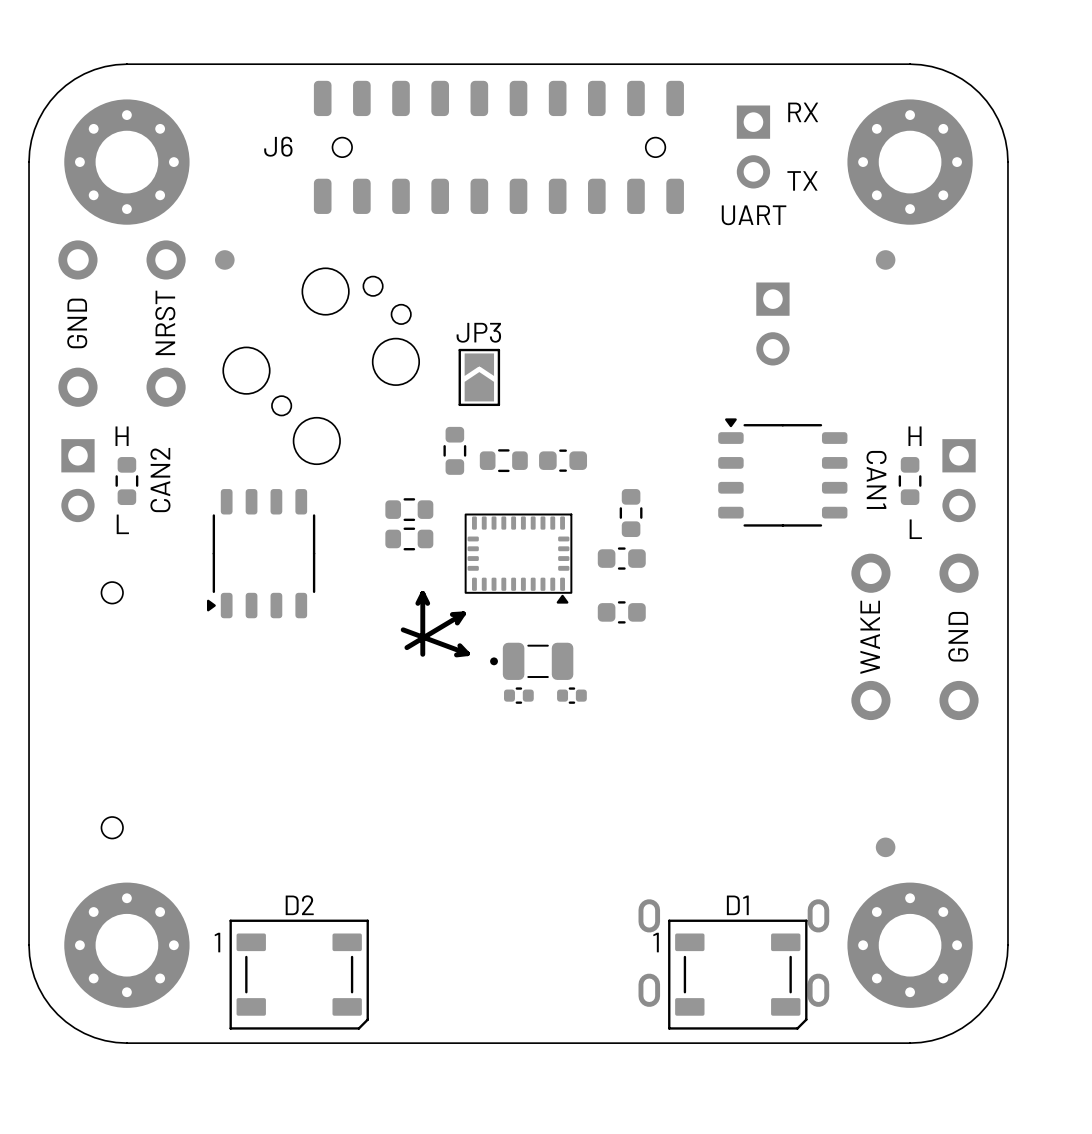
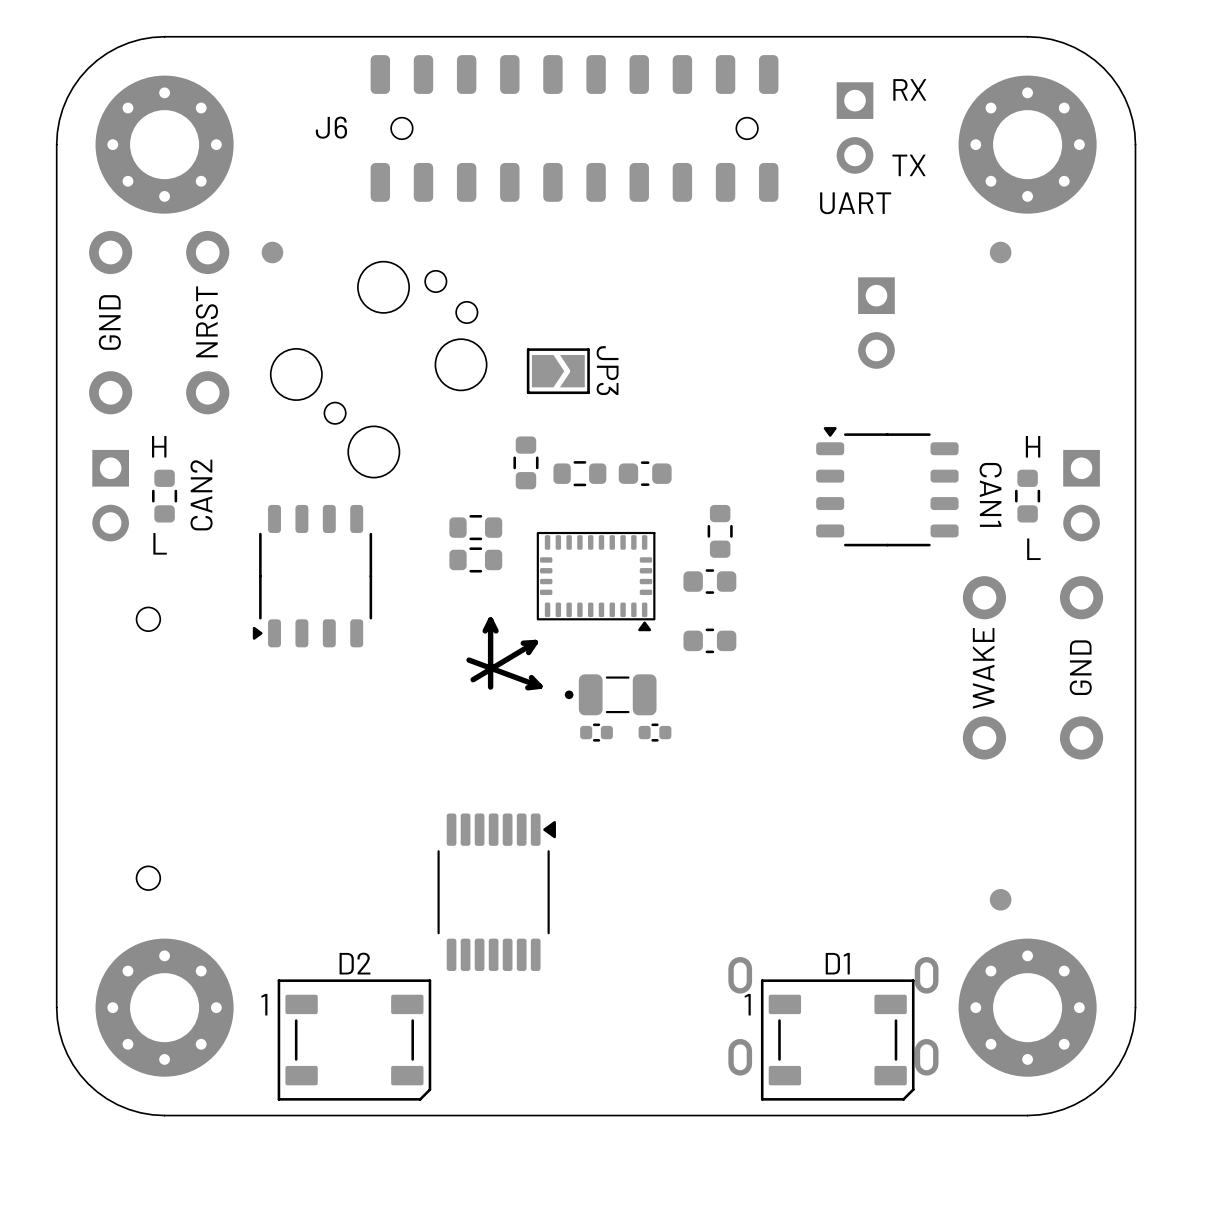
JP3 rotation: 0° (479, 377) -> 90° clockwise (558, 371)
part: none -> (496, 892)

